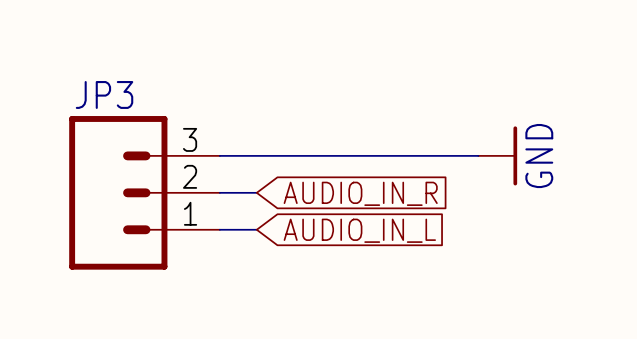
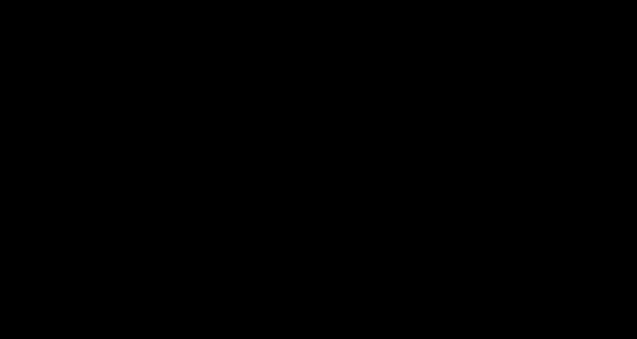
wire: (219, 155) (478, 155) -> none
power symbol: GND (497, 155) -> none
JP3: (144, 192) -> none
wire: (219, 192) (256, 192) -> none
global label: AUDIO_IN_R (360, 193) -> none
wire: (219, 229) (256, 229) -> none
global label: AUDIO_IN_L (359, 230) -> none

